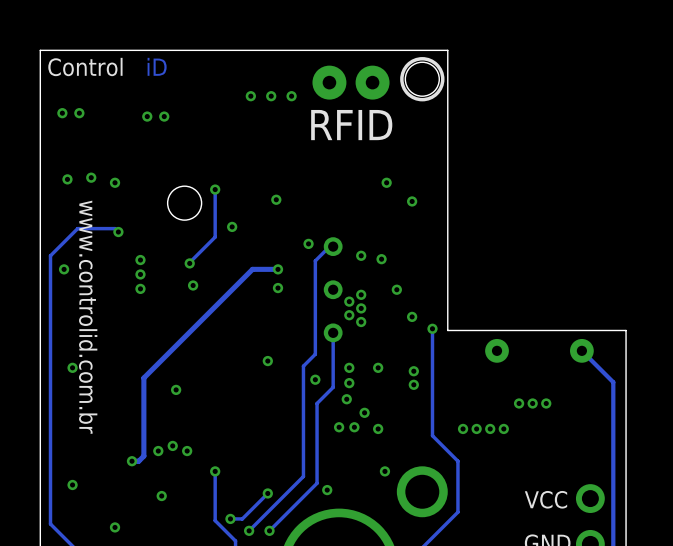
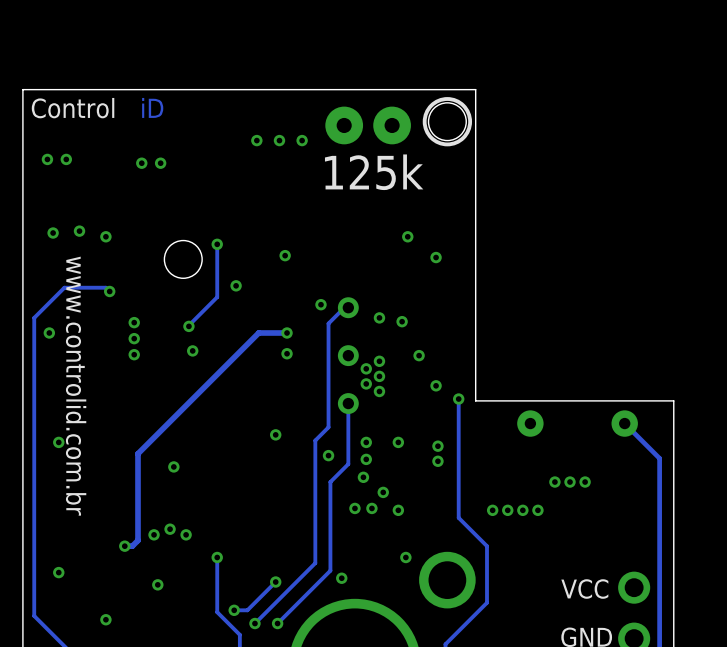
text: RFID (351, 125) -> 125k (374, 172)

